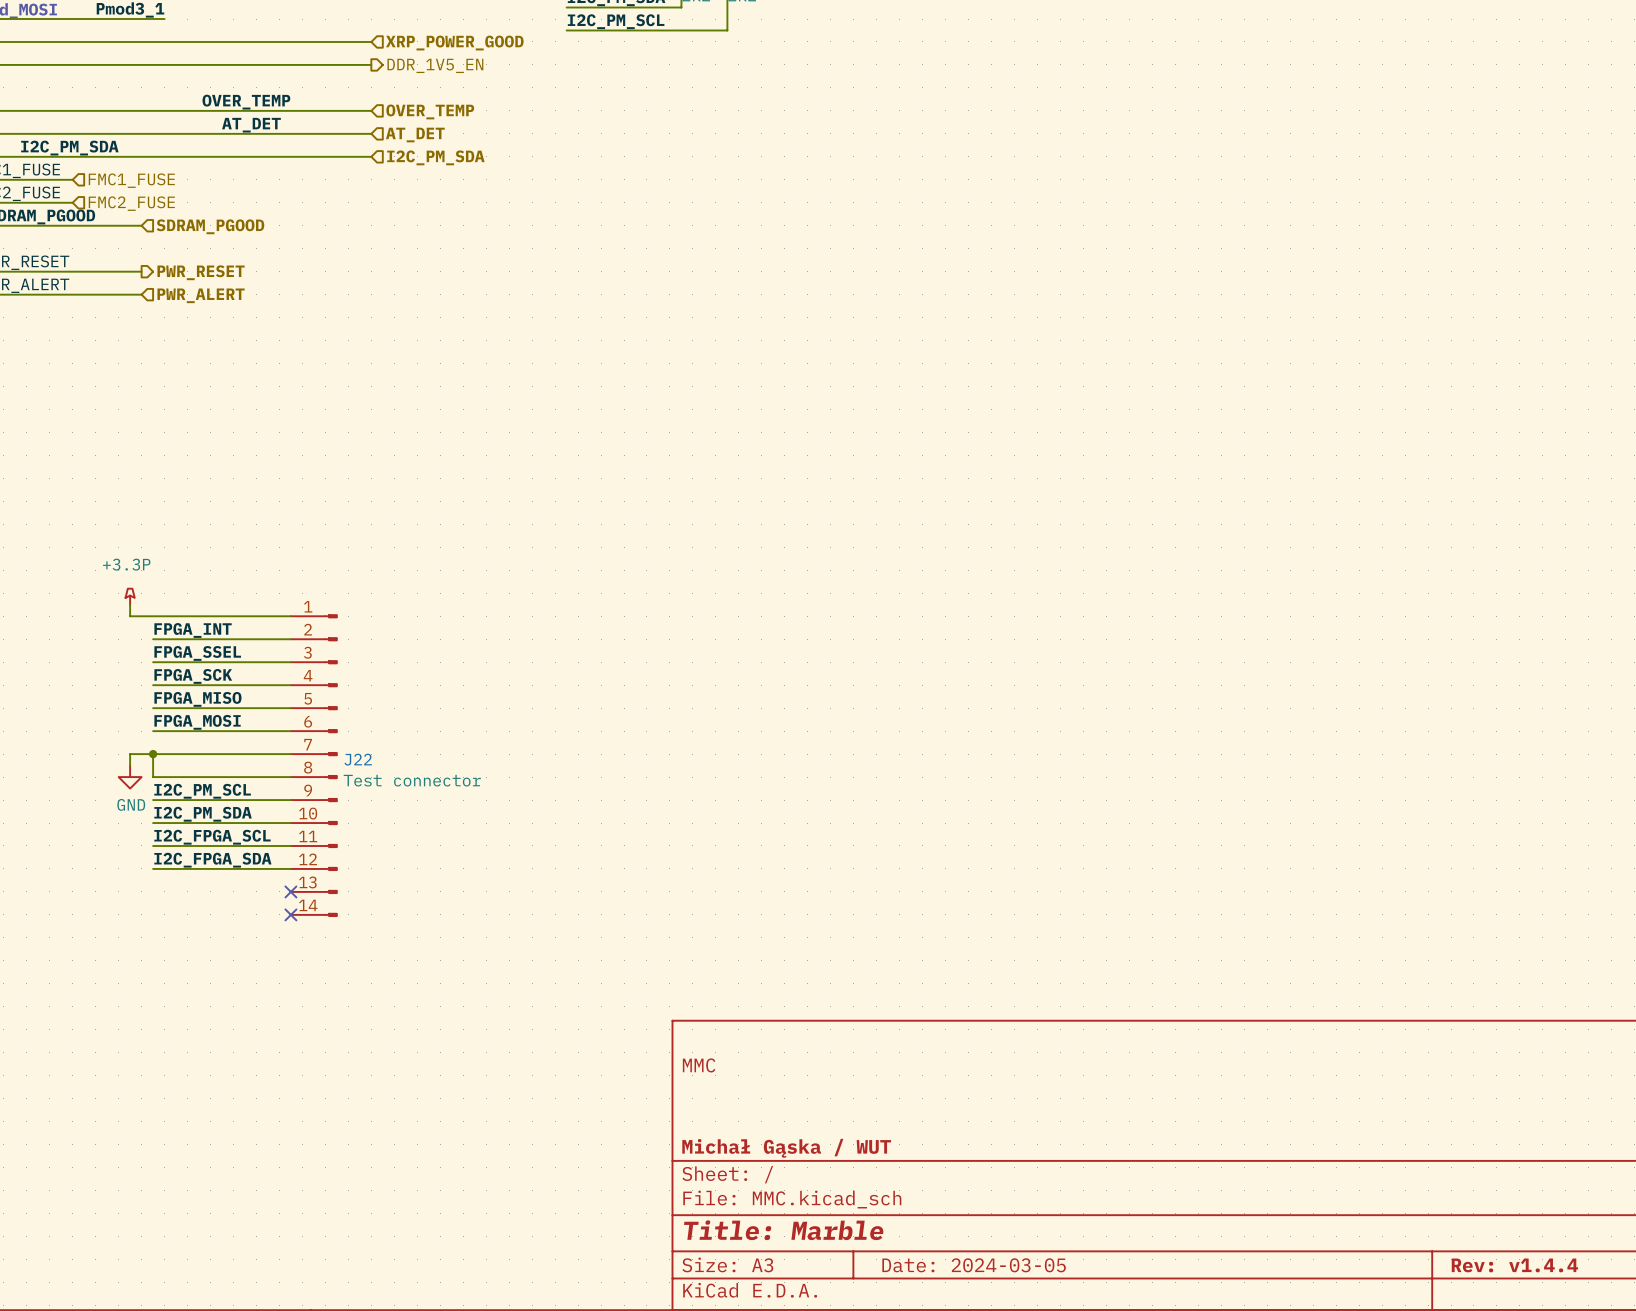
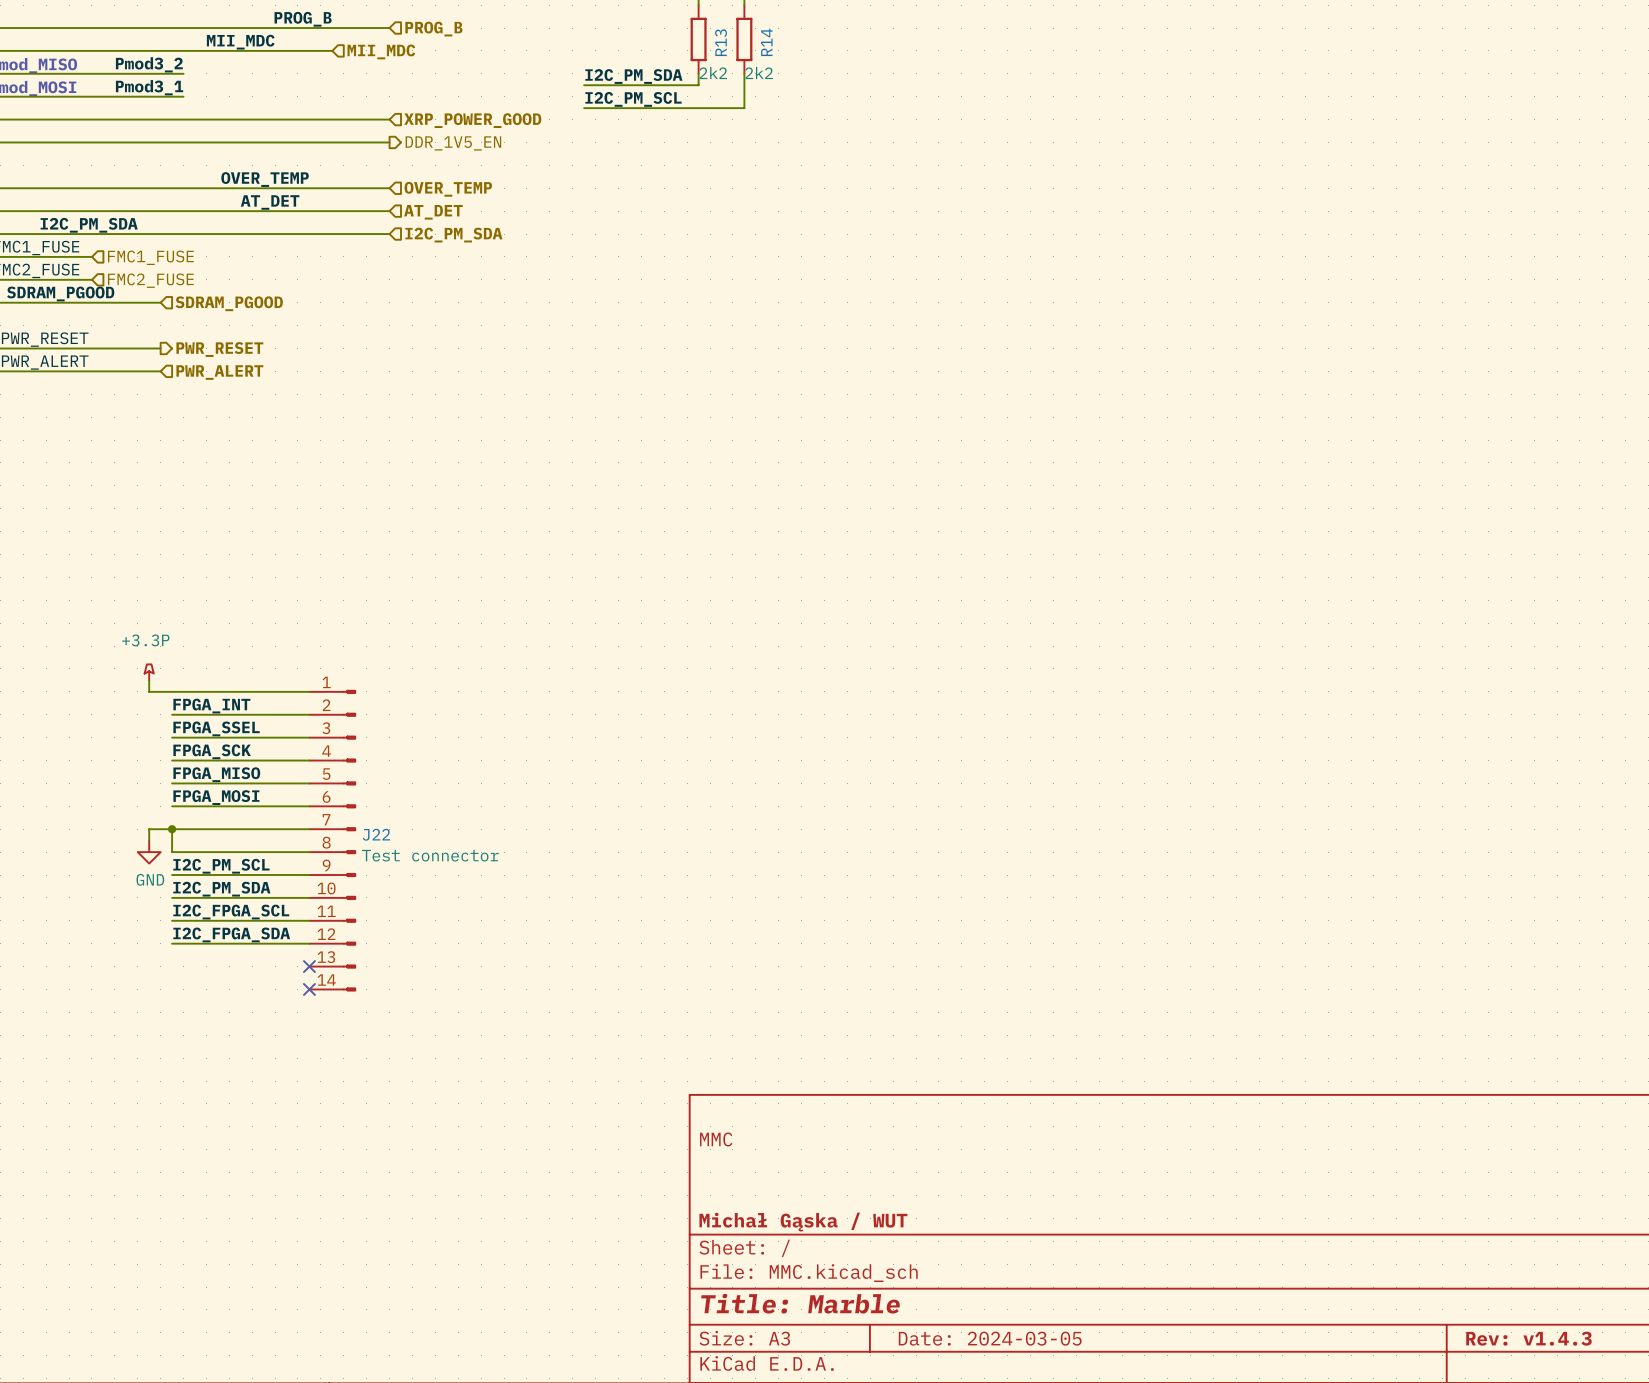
title block: Rev: v1.4.4 (1514, 1265) -> Rev: v1.4.3 (1528, 1338)

